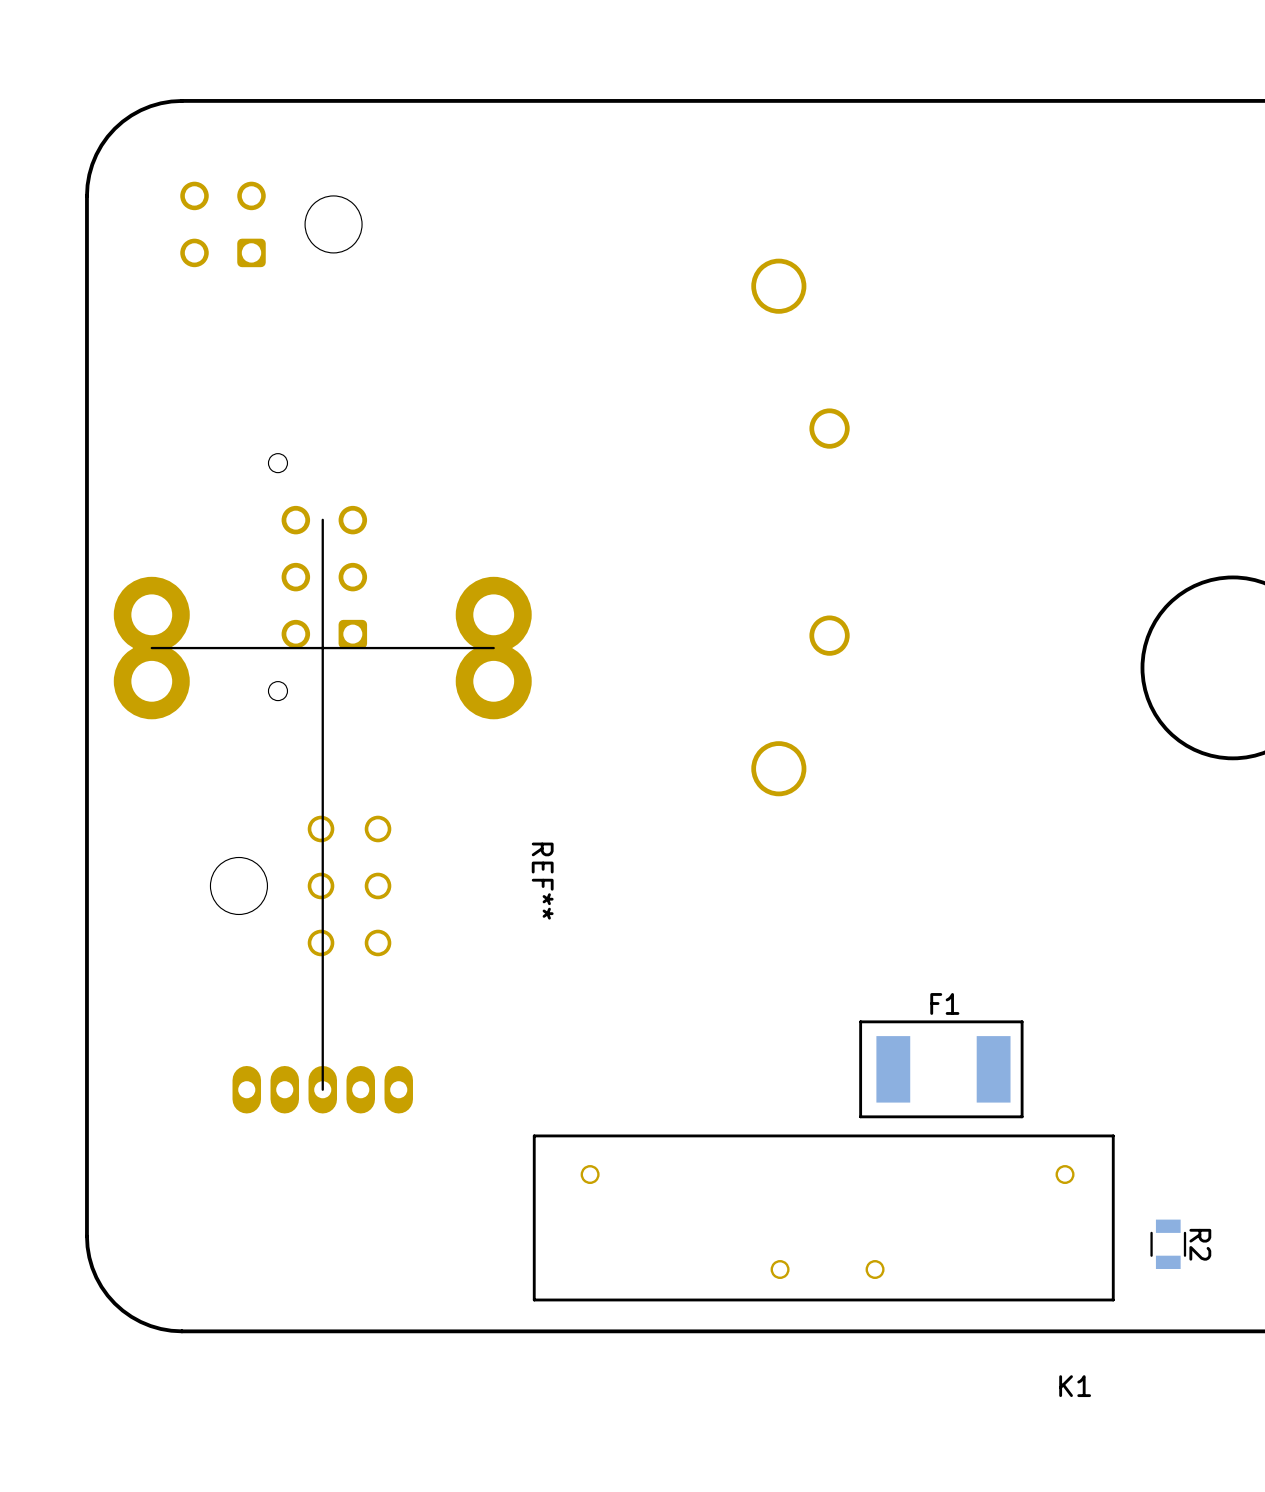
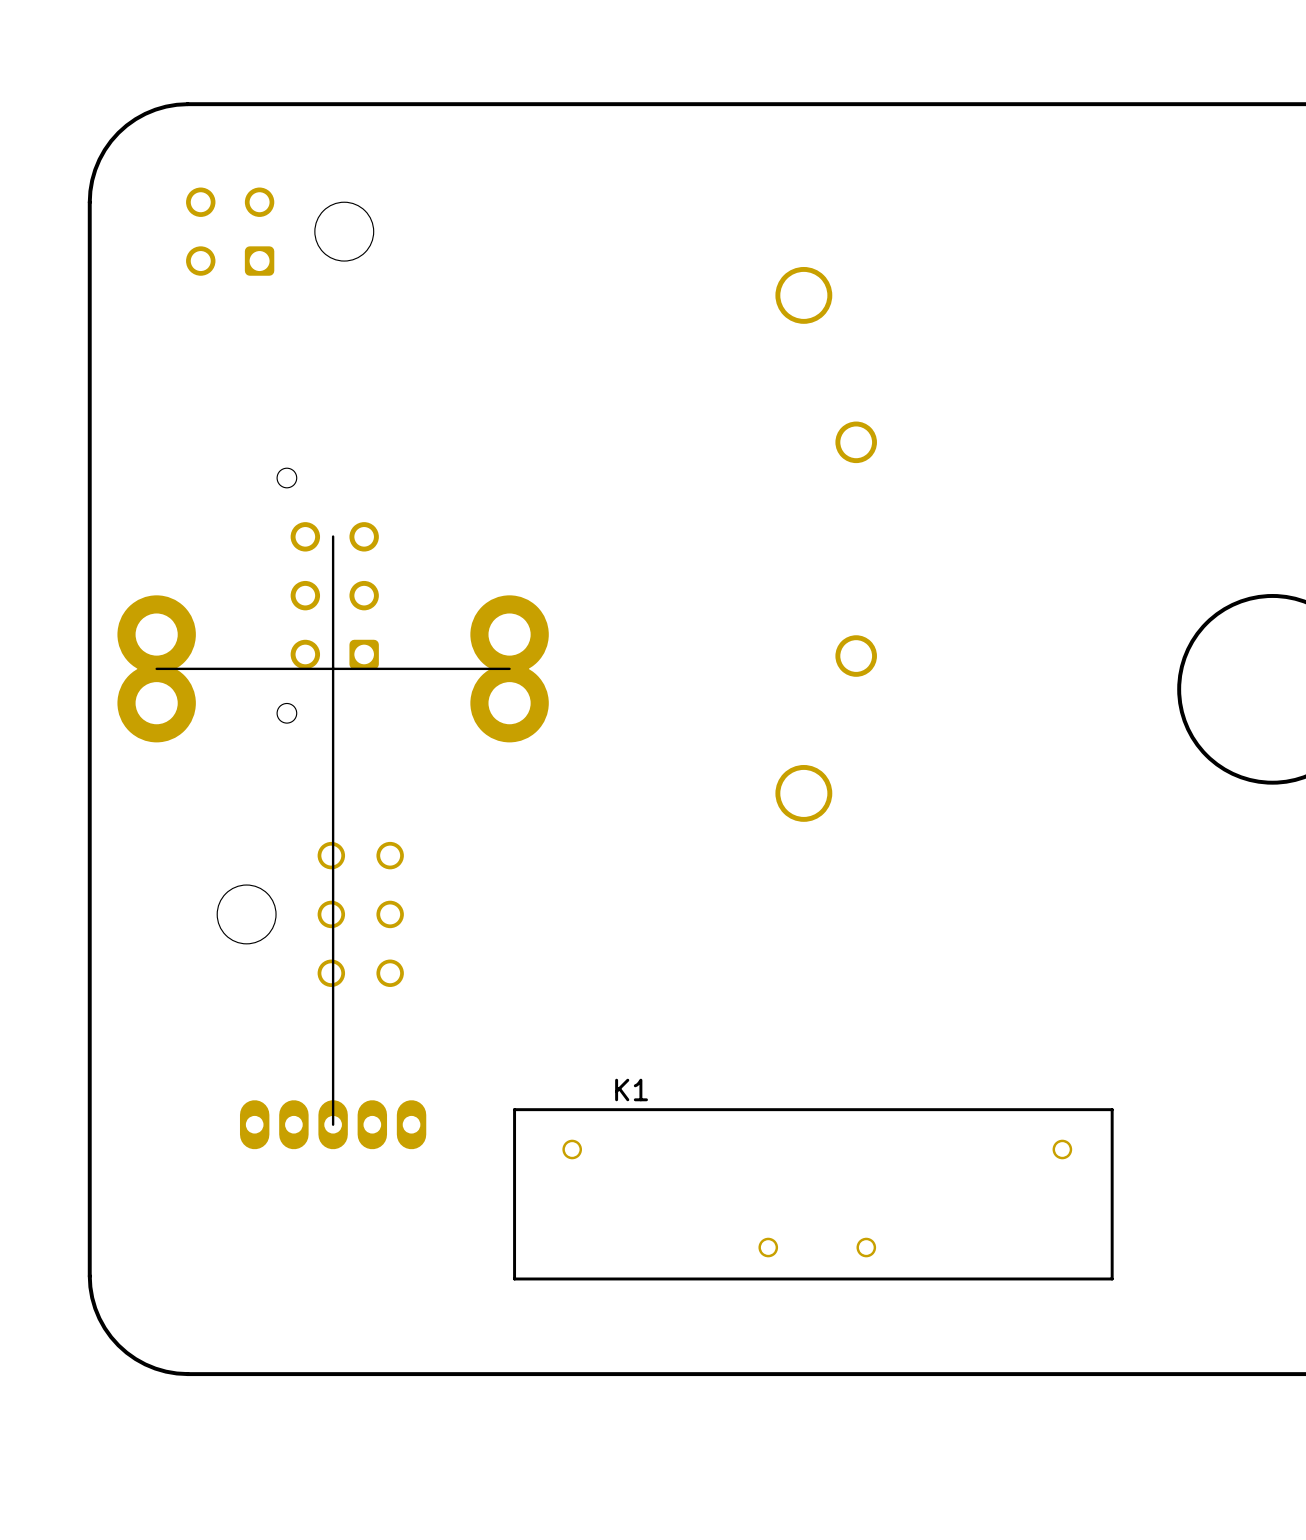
REF** name: REF** (542, 881) -> none
F1: (941, 1069) -> none
K1 position: (823, 1217) -> (813, 1194)
R2: (1168, 1244) -> none
K1 name position: K1 (1075, 1386) -> K1 (631, 1090)

